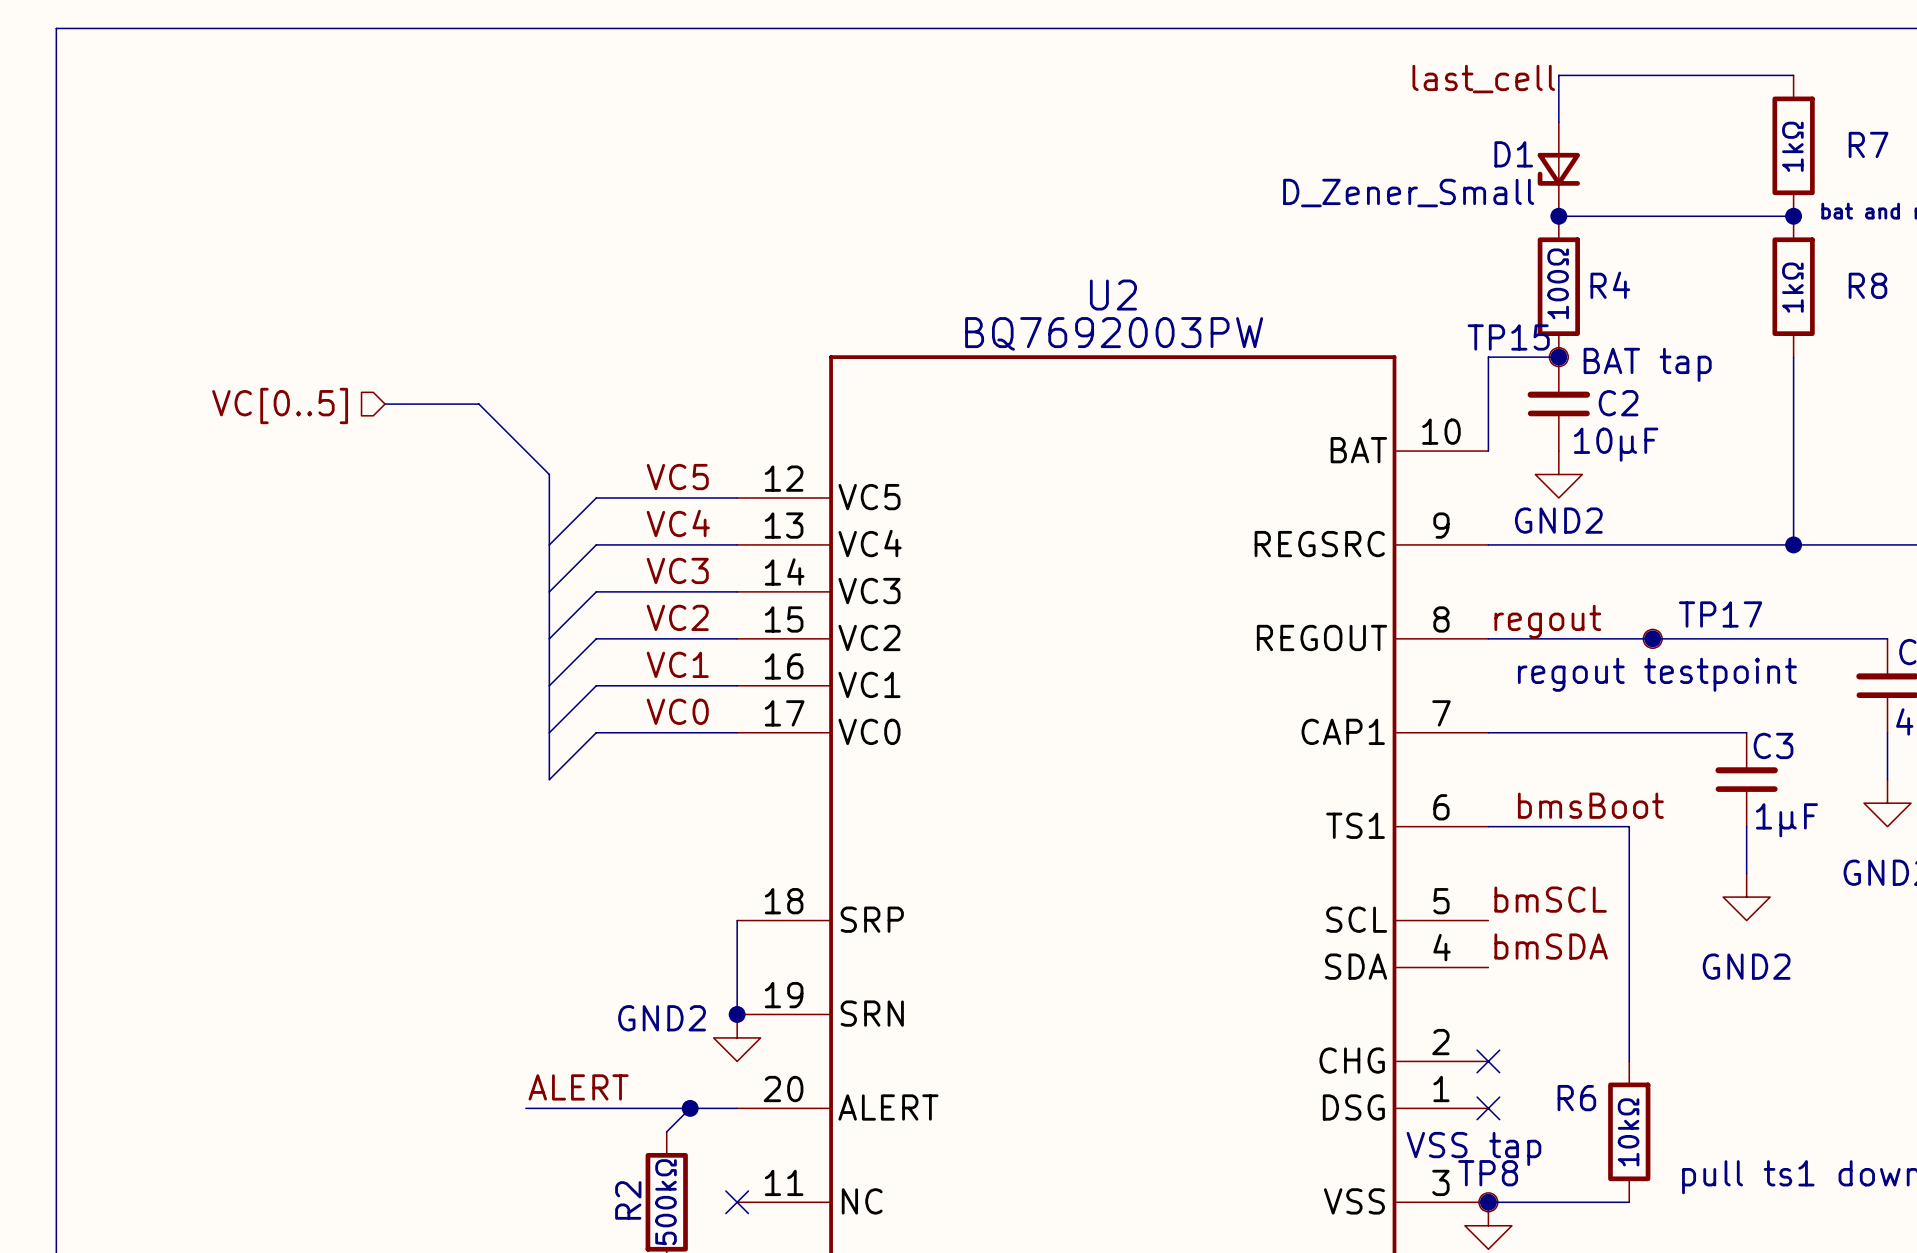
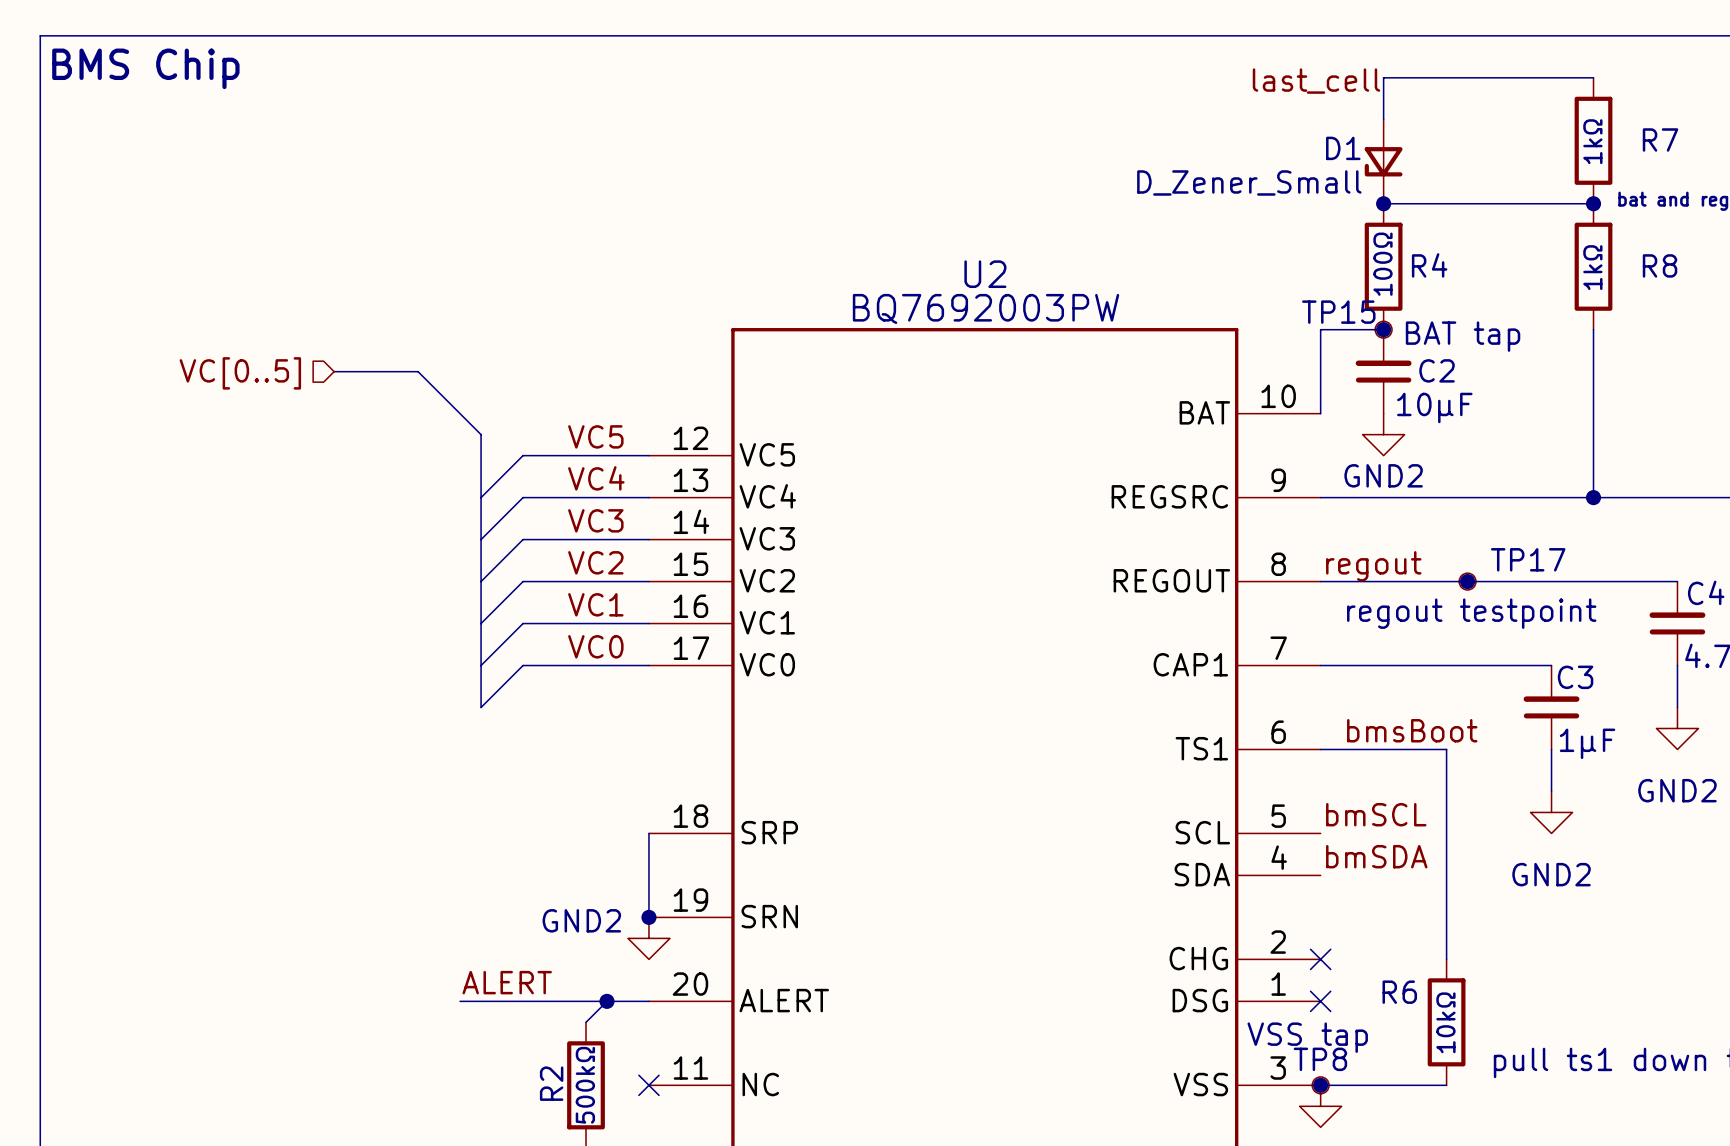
text: none -> BMS Chip (145, 68)

